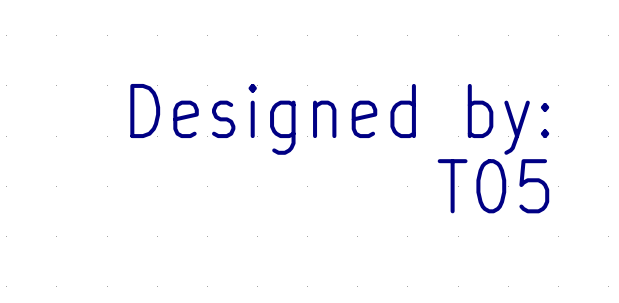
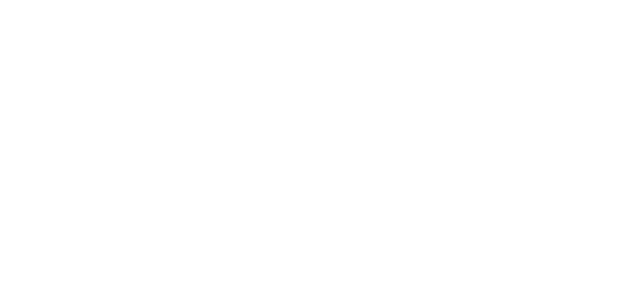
text: Designed by: (339, 119) -> none
text: T05 (493, 186) -> none

